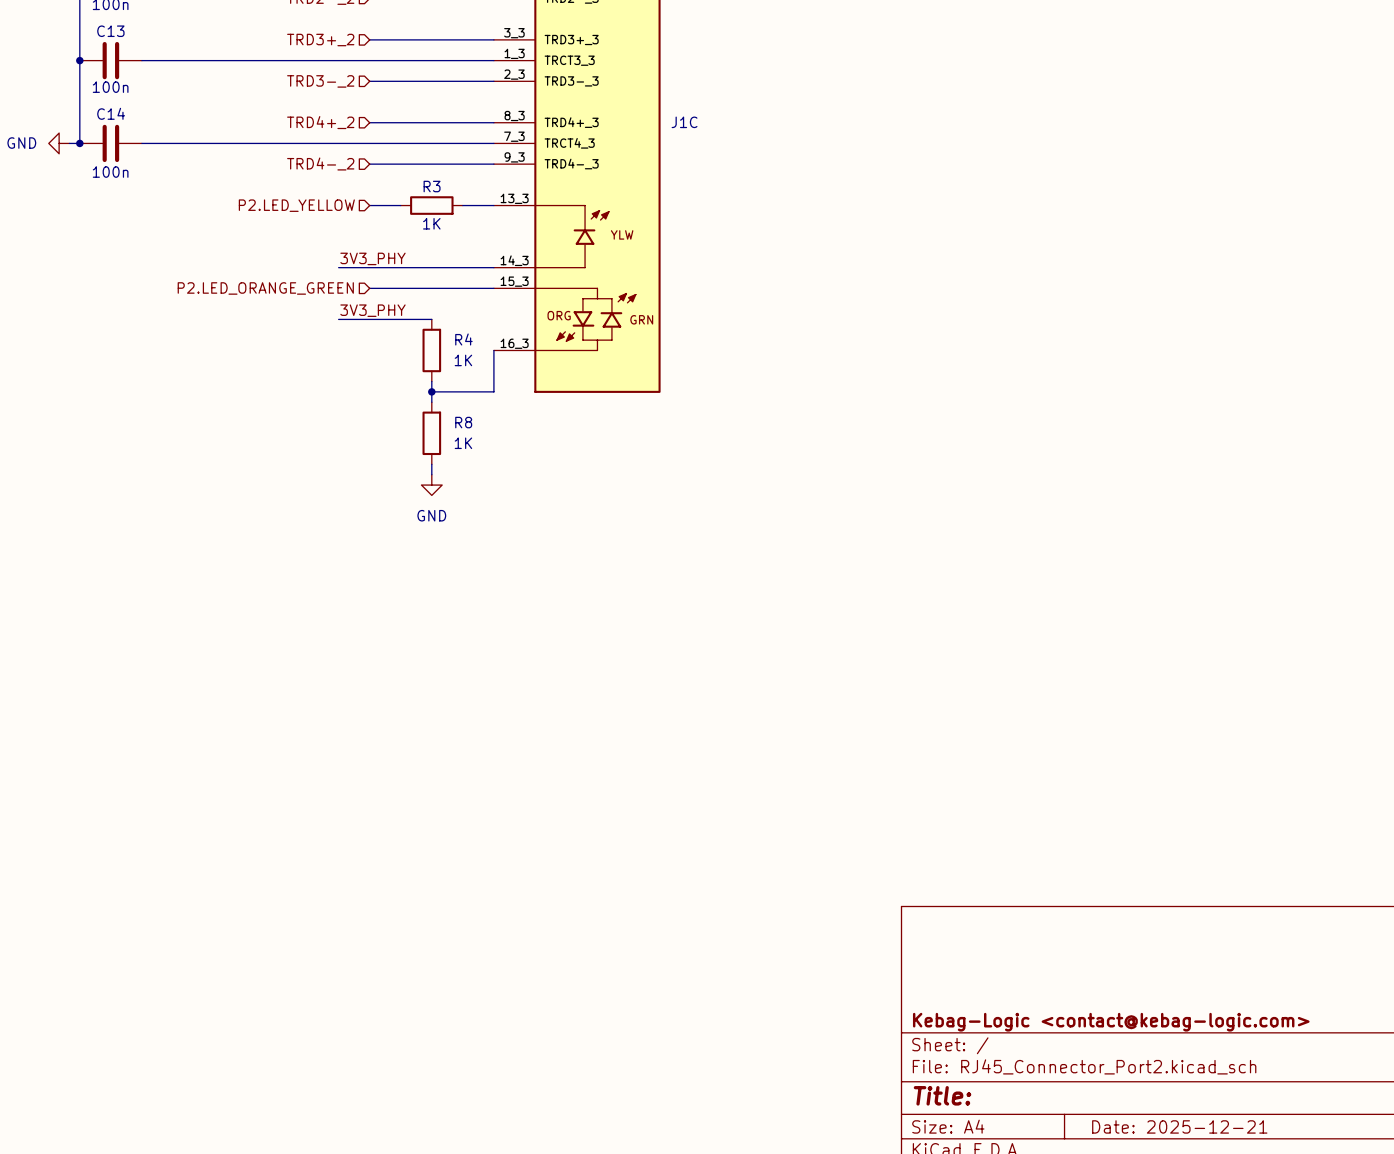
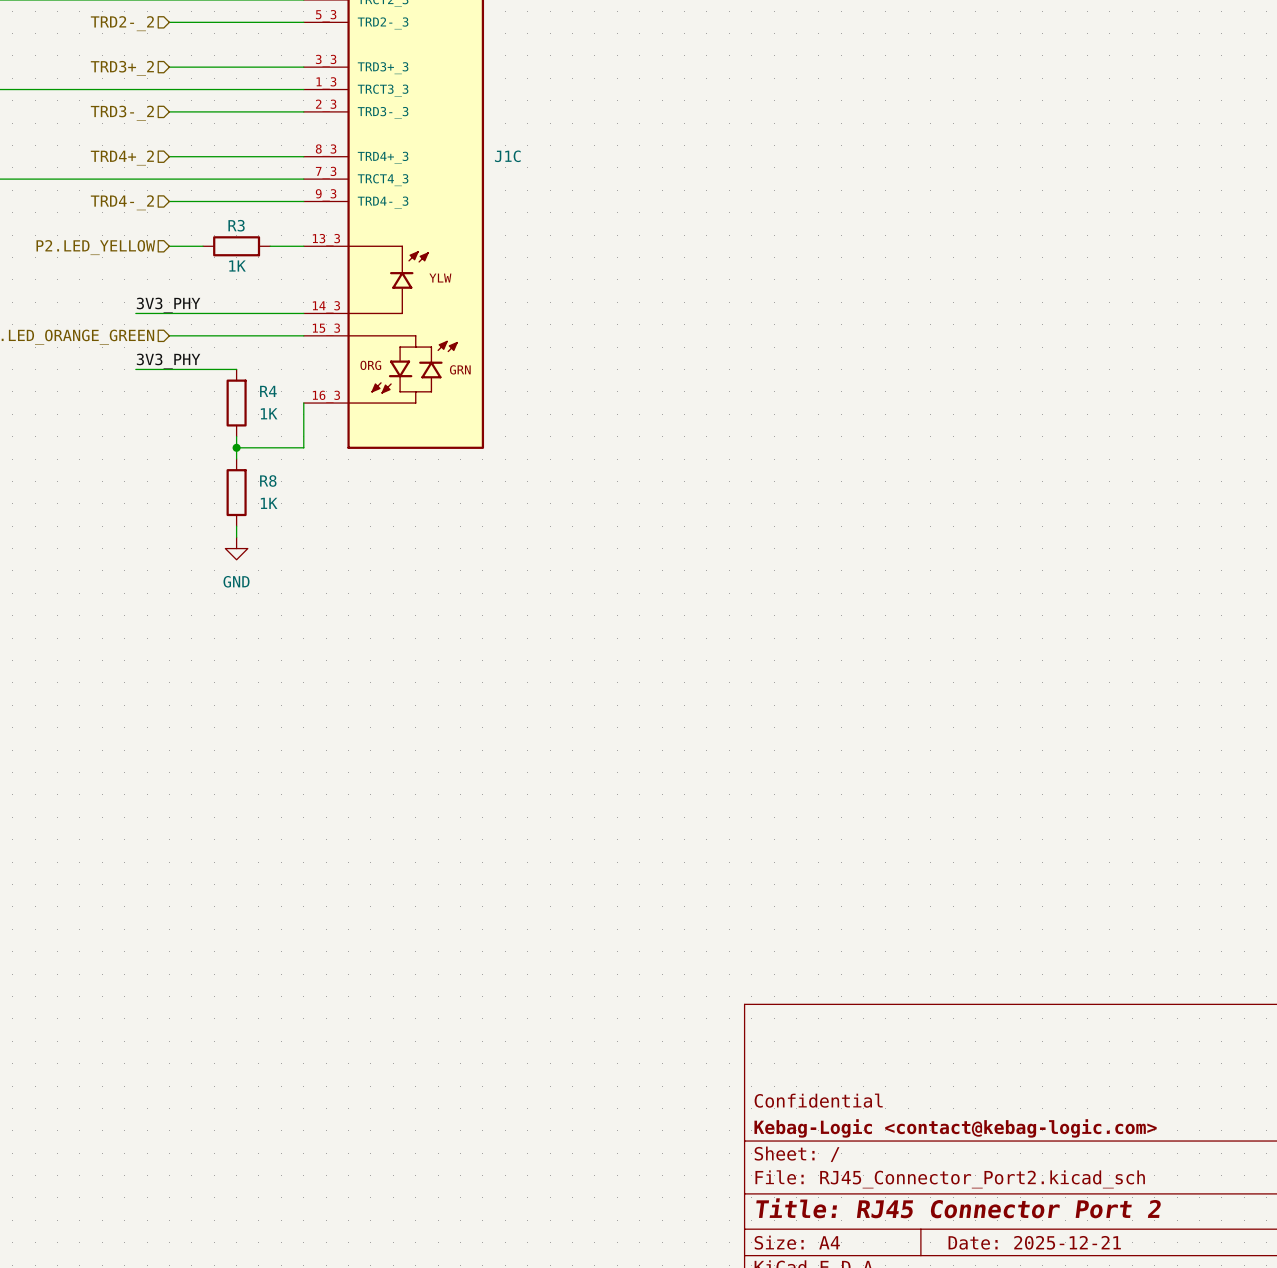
title block: none -> Confidential (818, 1100)
title block: Title: (942, 1095) -> Title: RJ45 Connector Port 2 (958, 1208)

